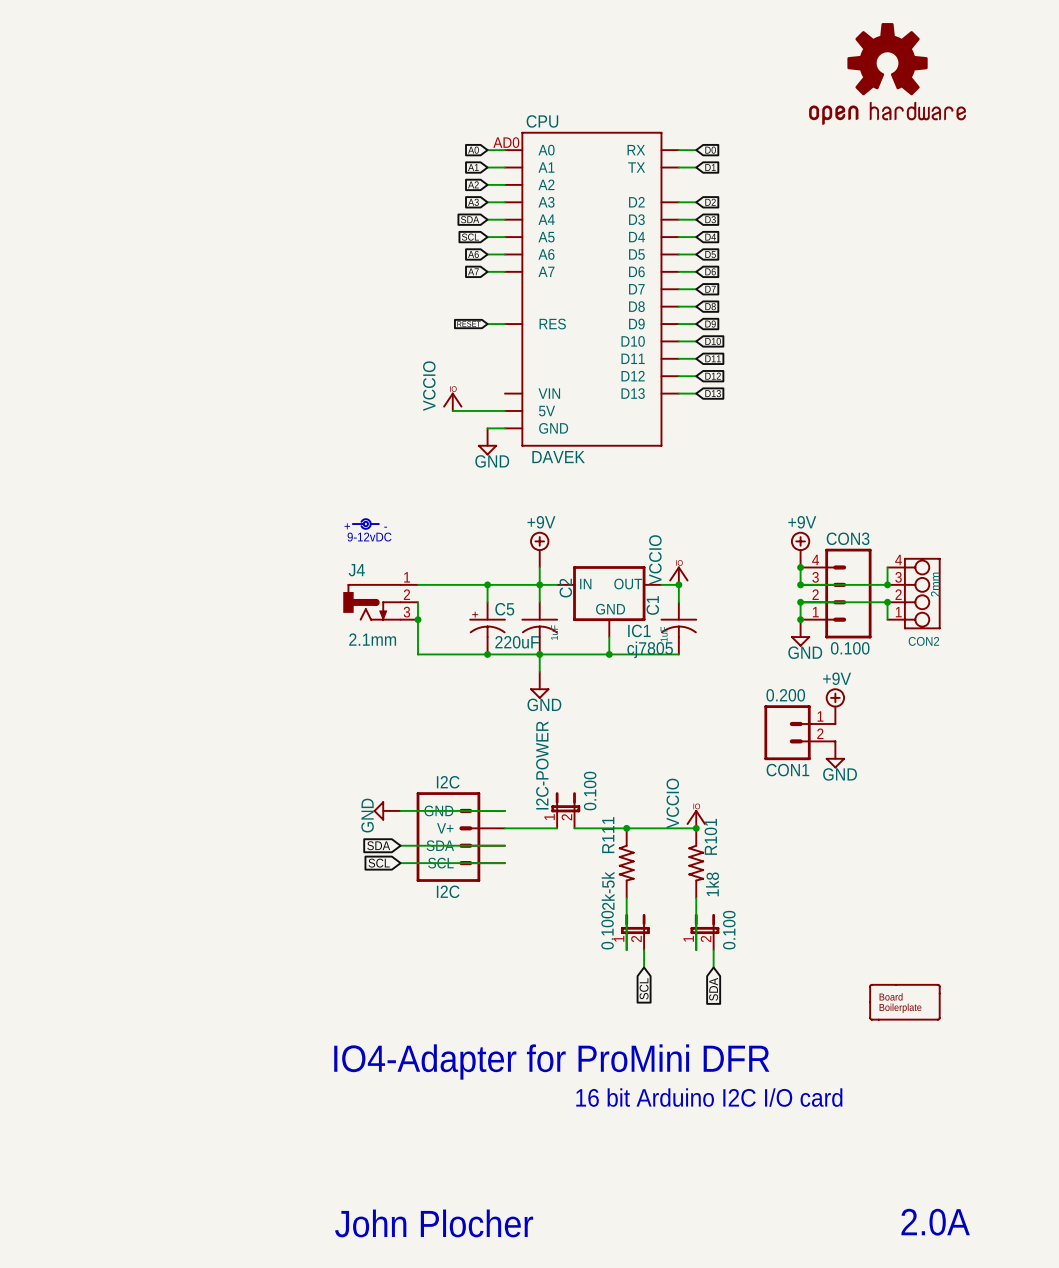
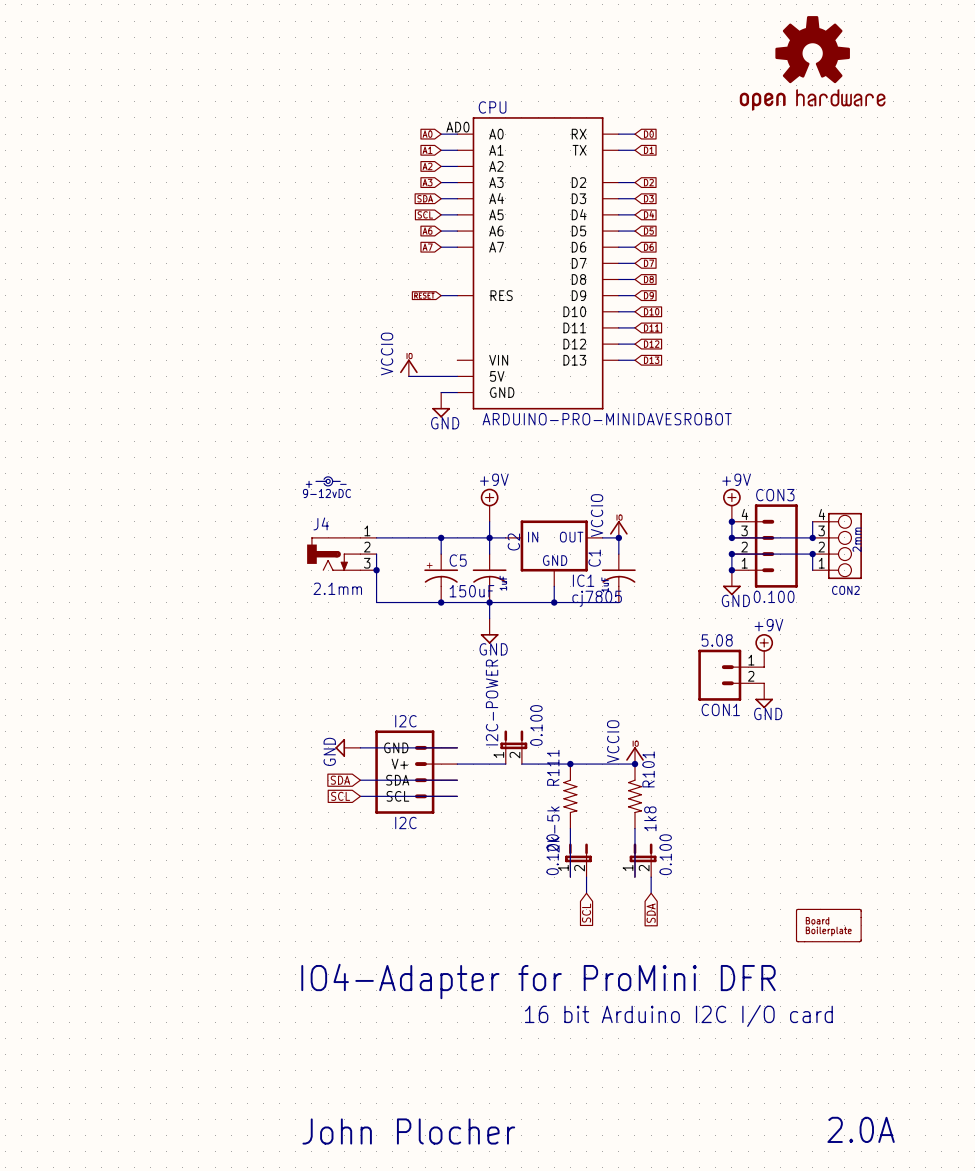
CPU value: DAVEK (558, 457) -> ARDUINO-PRO-MINIDAVESROBOT (607, 419)
C5 value: 220uF (517, 642) -> 150uF (471, 591)
CON1 value: 0.200 (785, 695) -> 5.08 (717, 640)

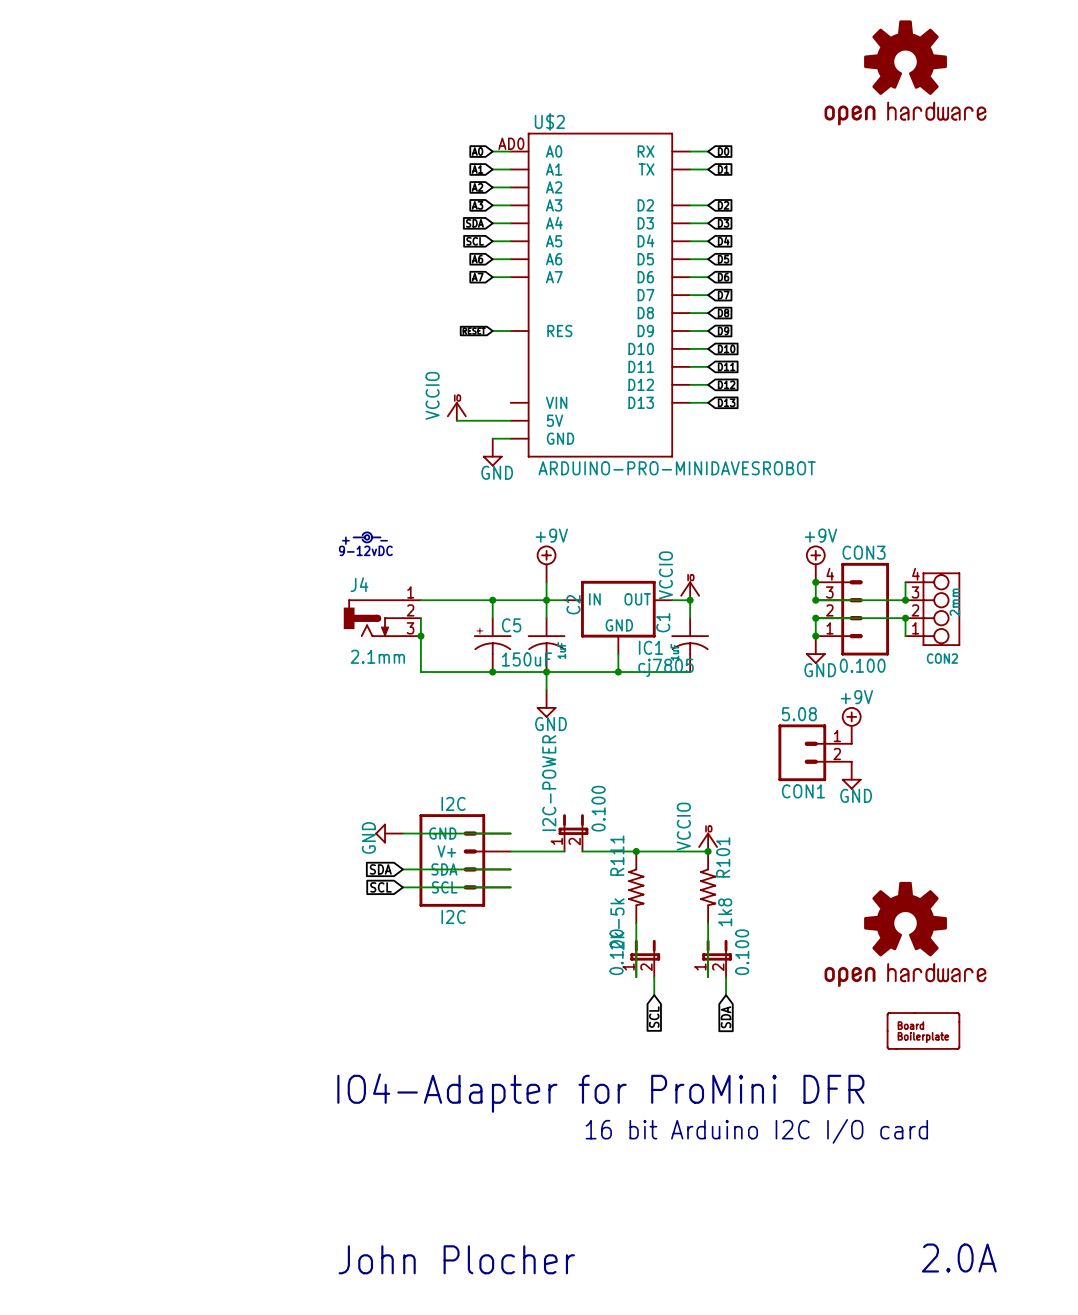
CPU name: CPU (492, 107) -> U$2 (549, 121)
part: none -> (905, 934)

